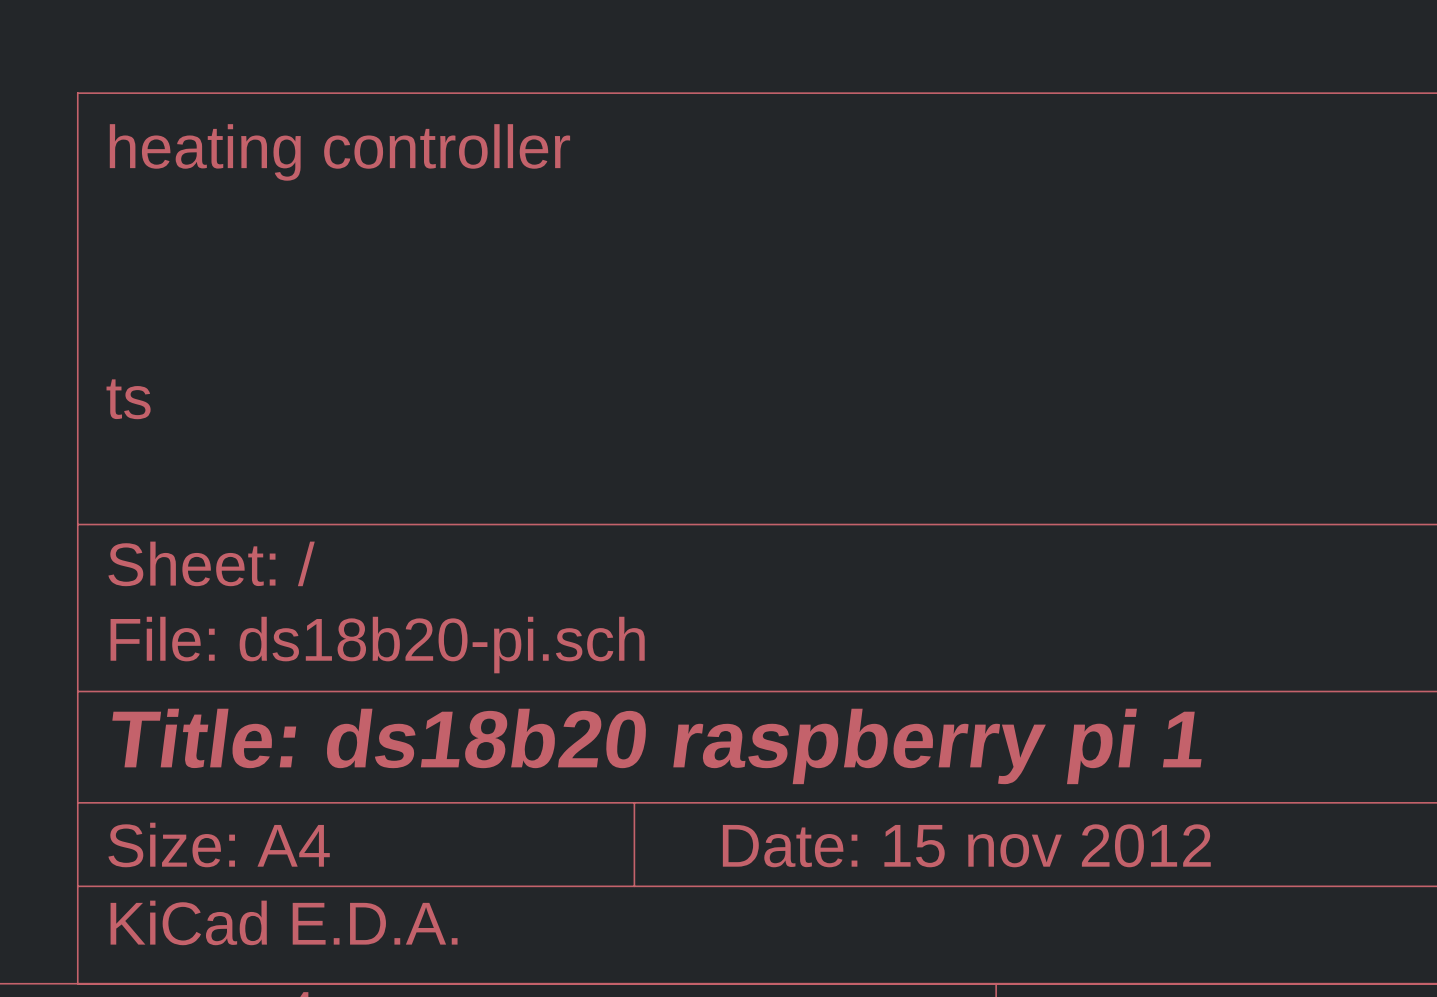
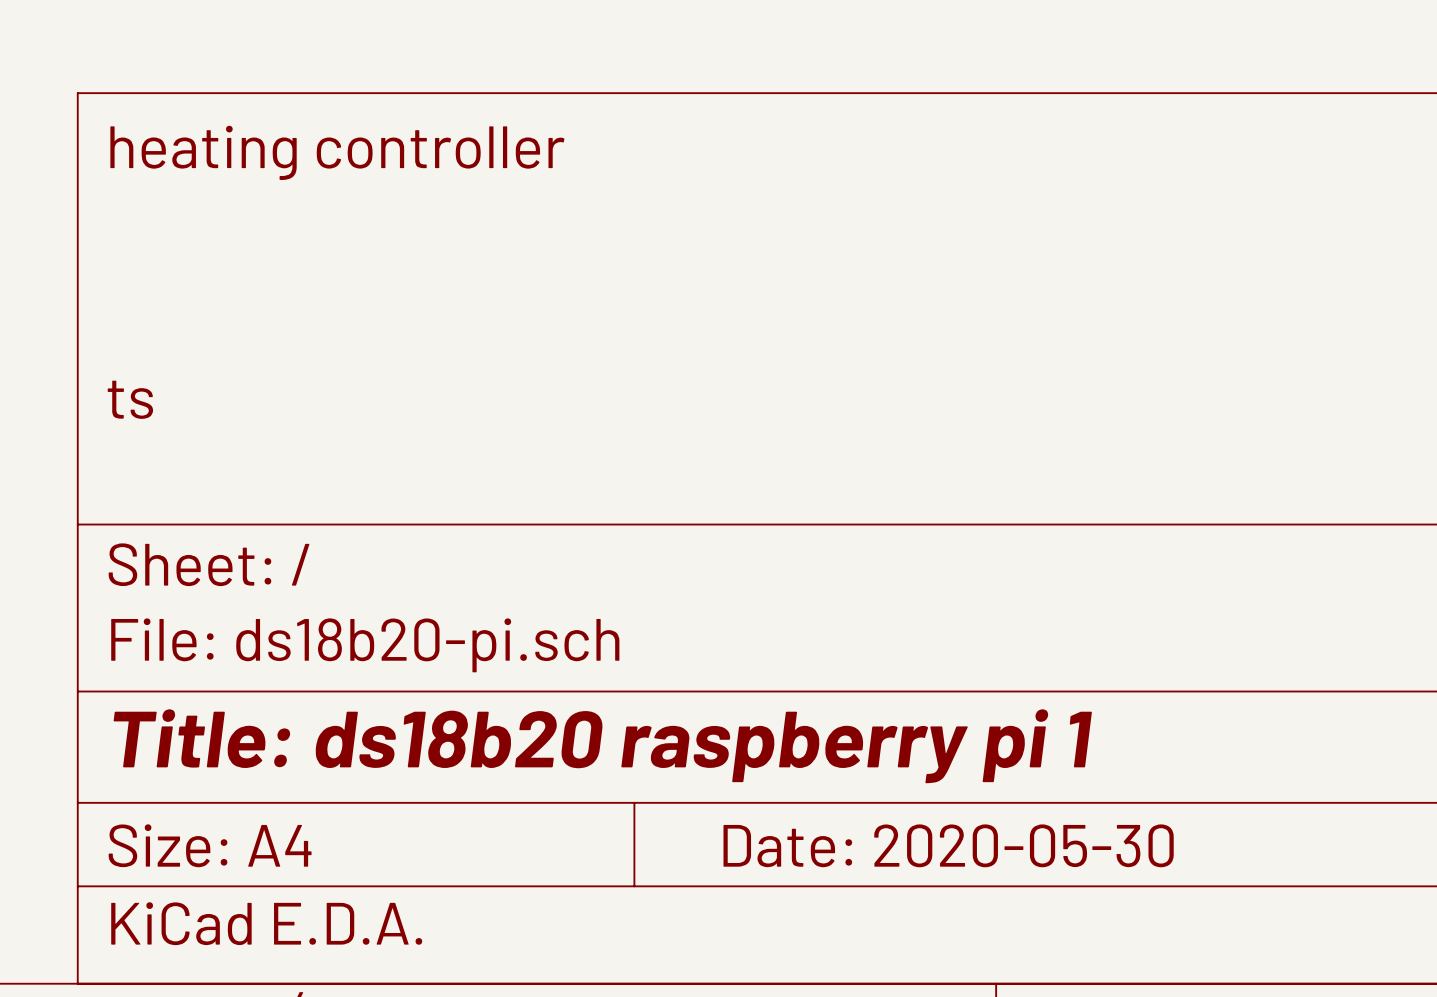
title block: Date: 15 nov 2012 (966, 845) -> Date: 2020-05-30 (948, 845)

